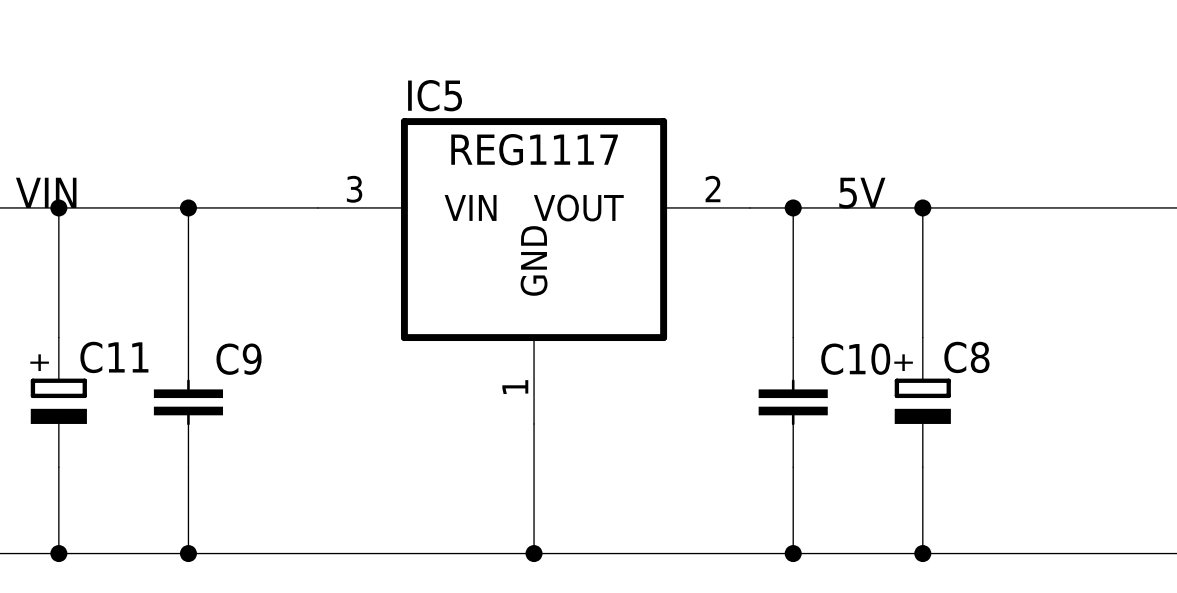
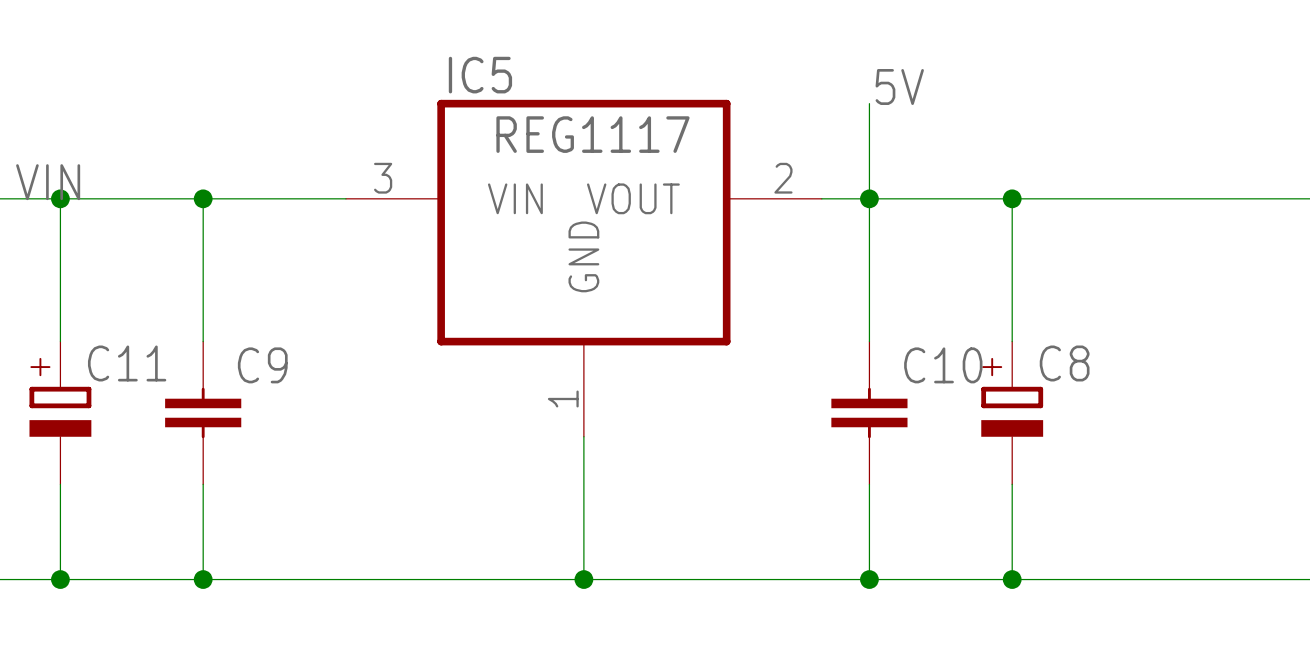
wire: none -> (869, 103) (869, 198)
label position: 5V (862, 193) -> 5V (899, 86)

